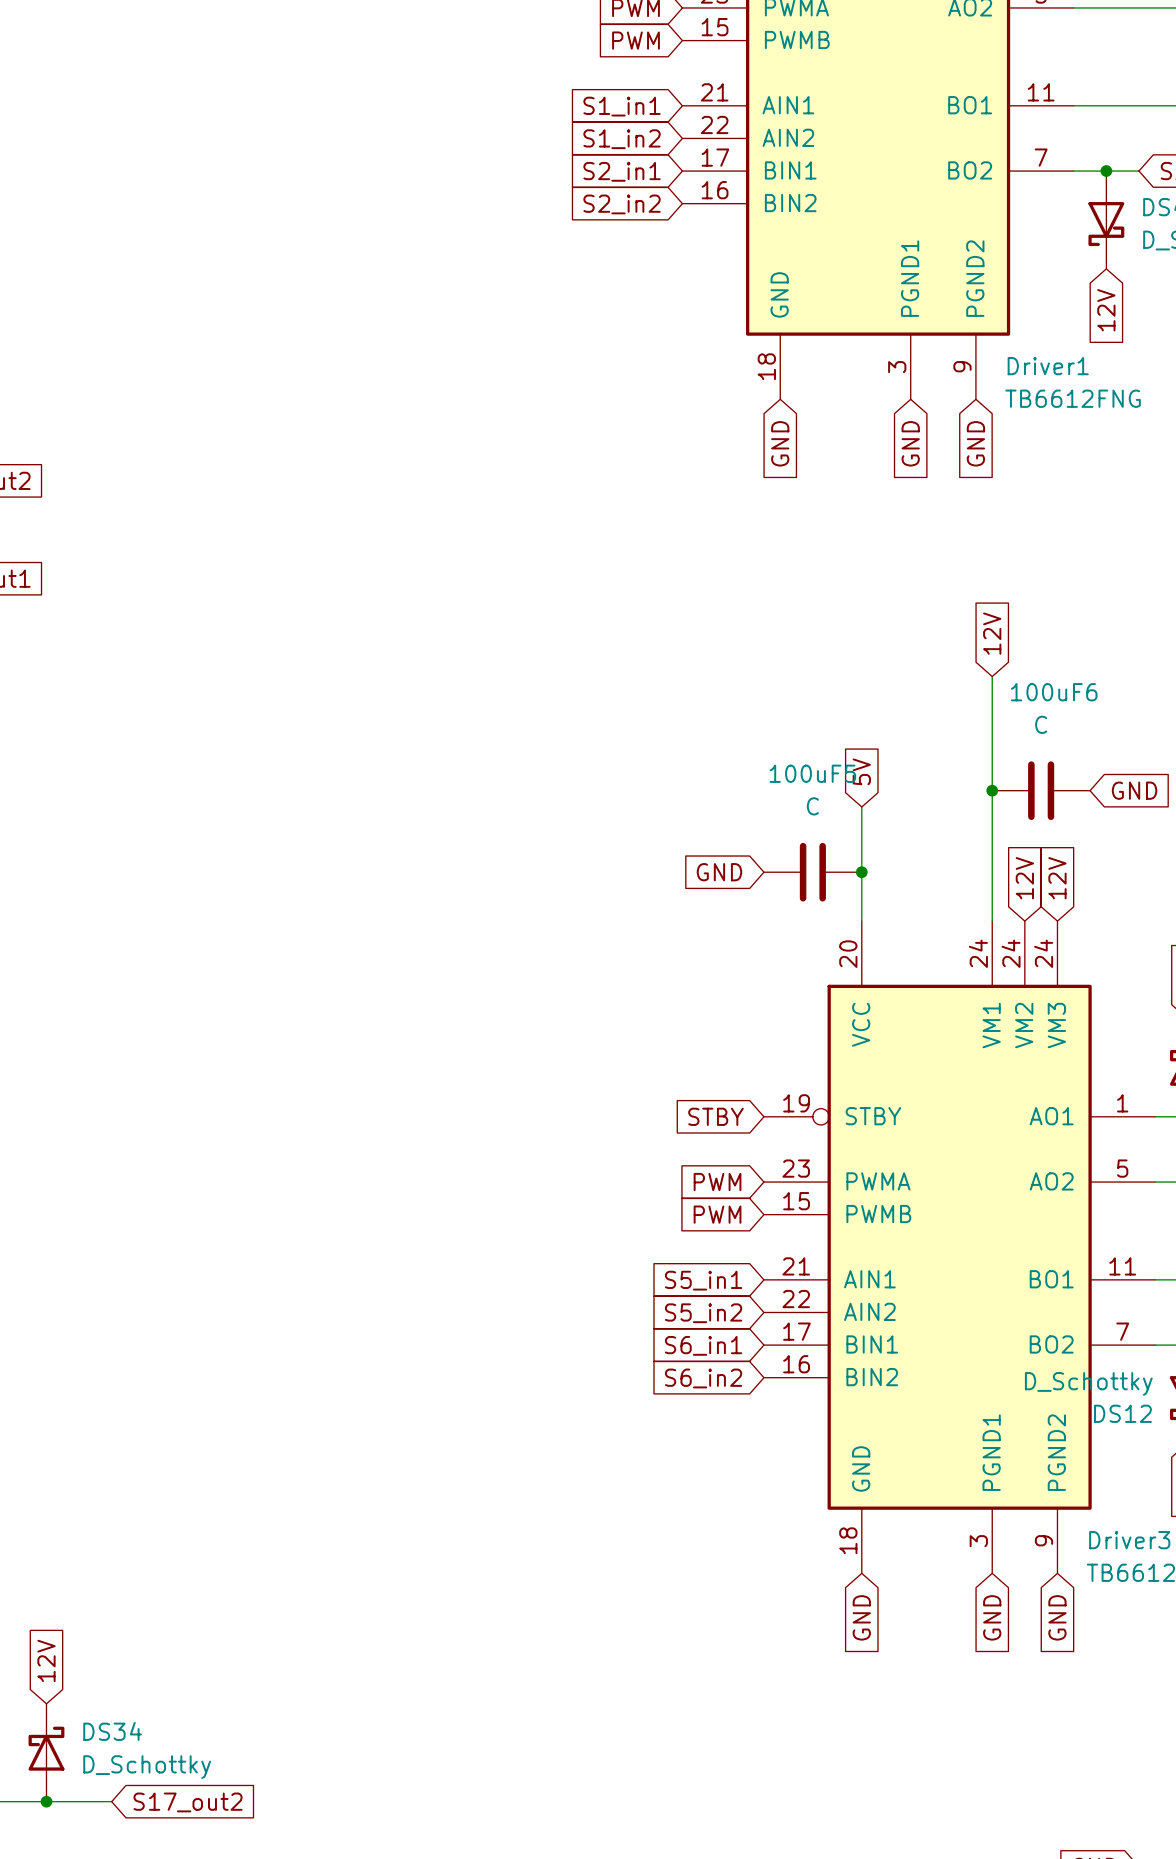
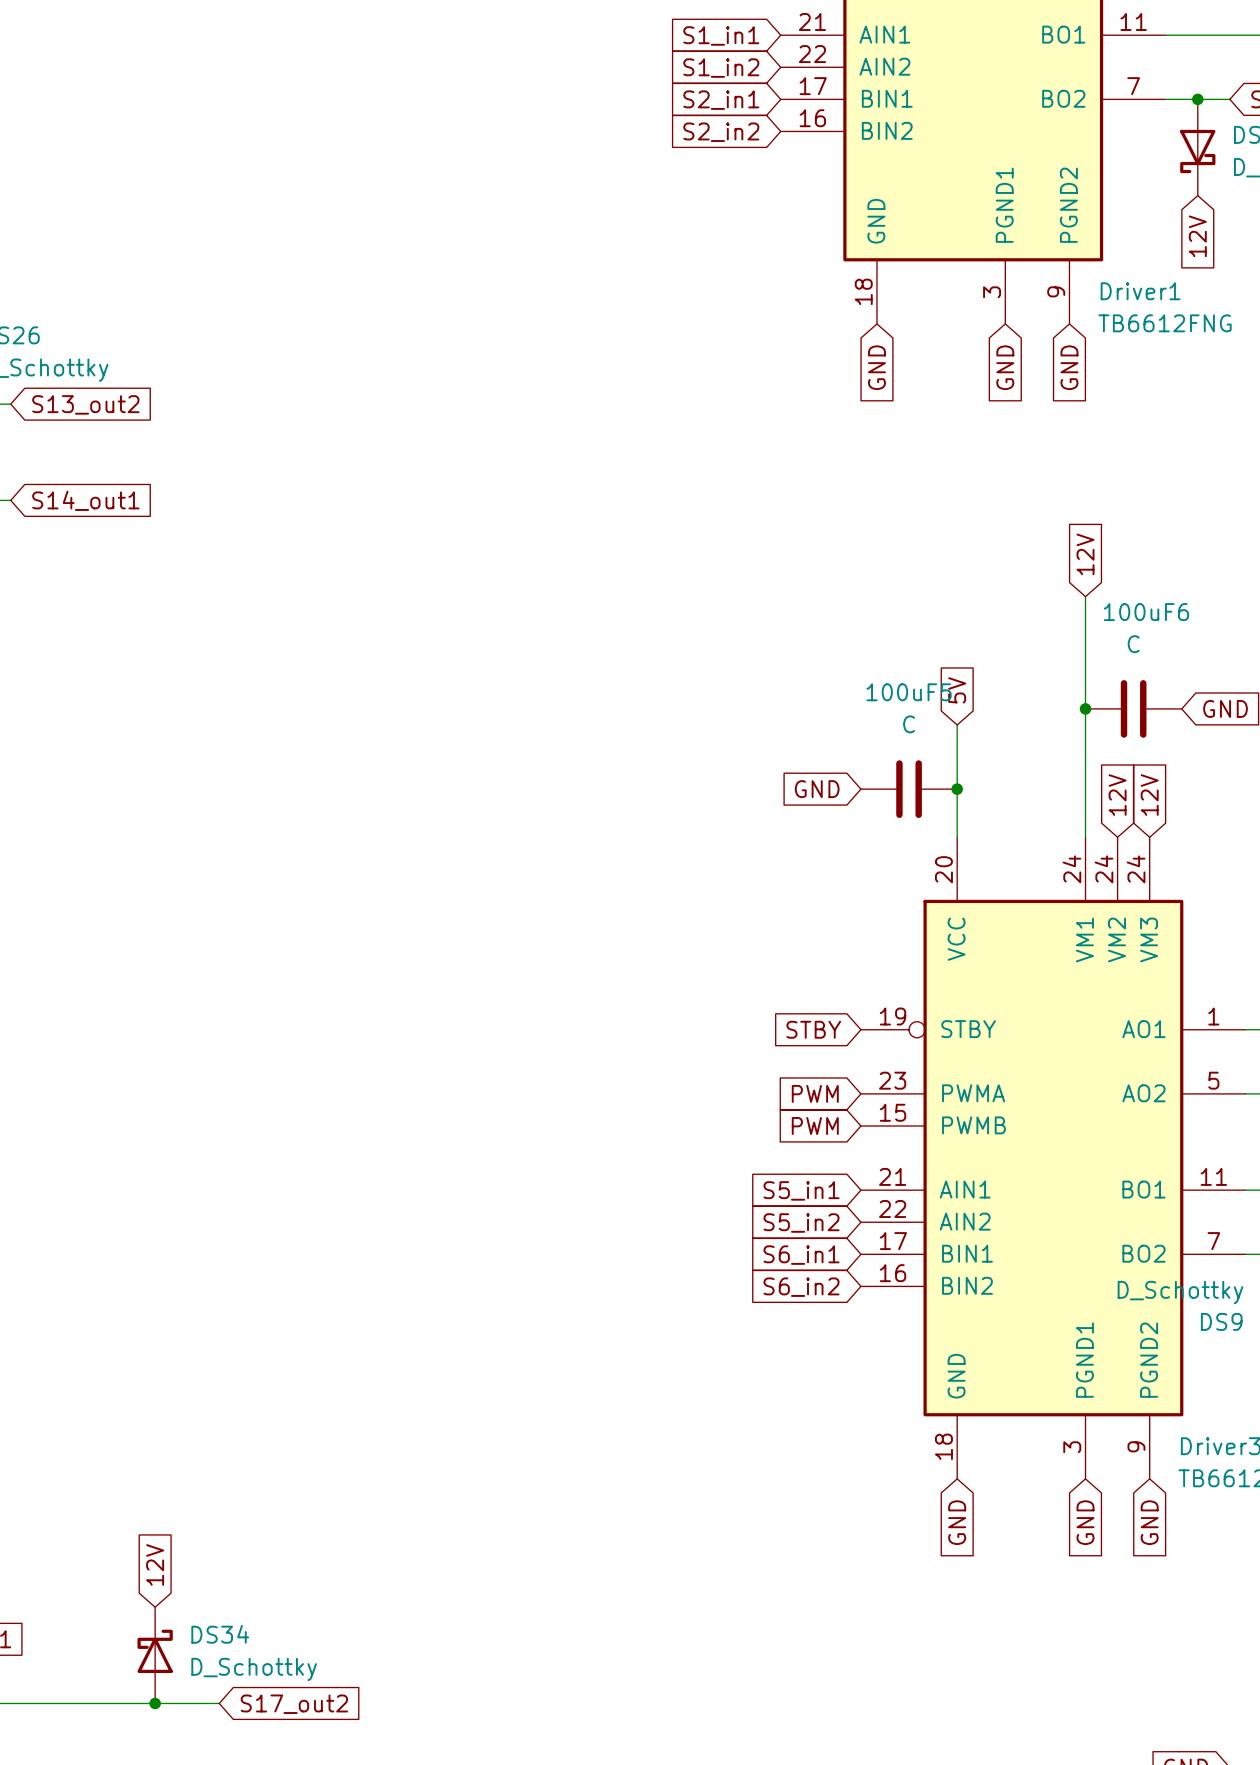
DS12 name: DS12 (1122, 1413) -> DS9 (1221, 1321)

